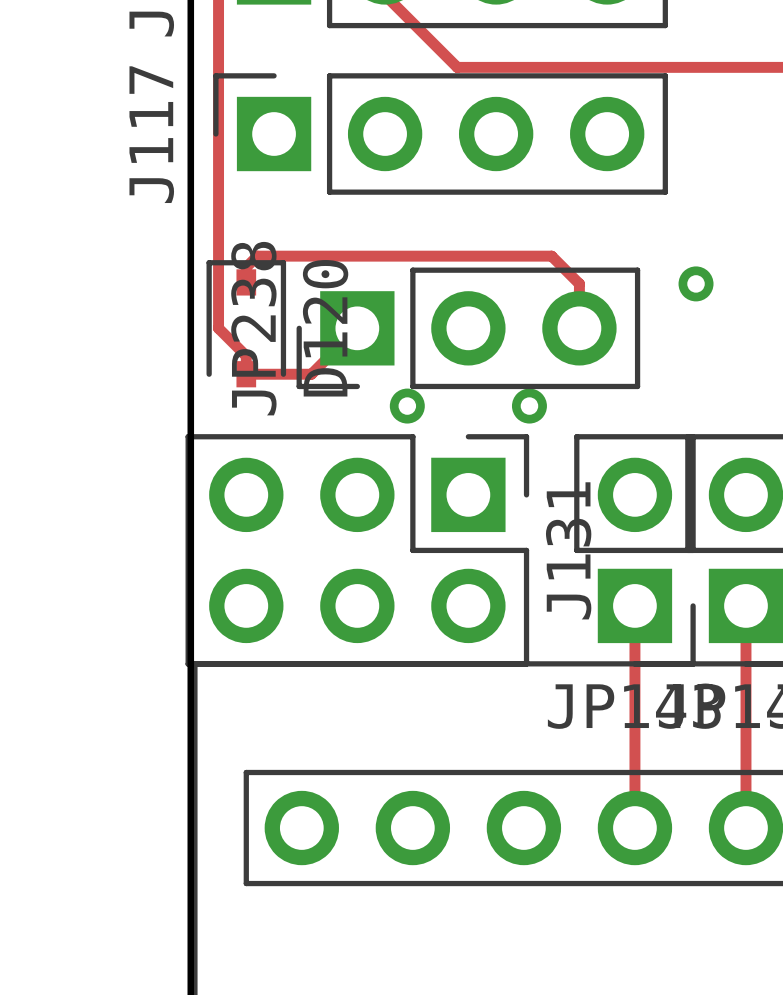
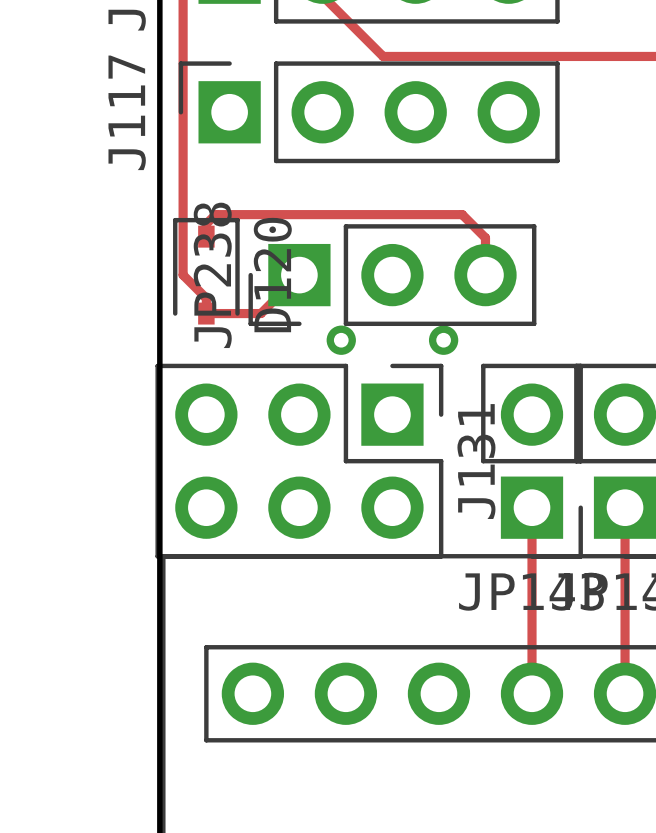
via: (696, 283) -> none

